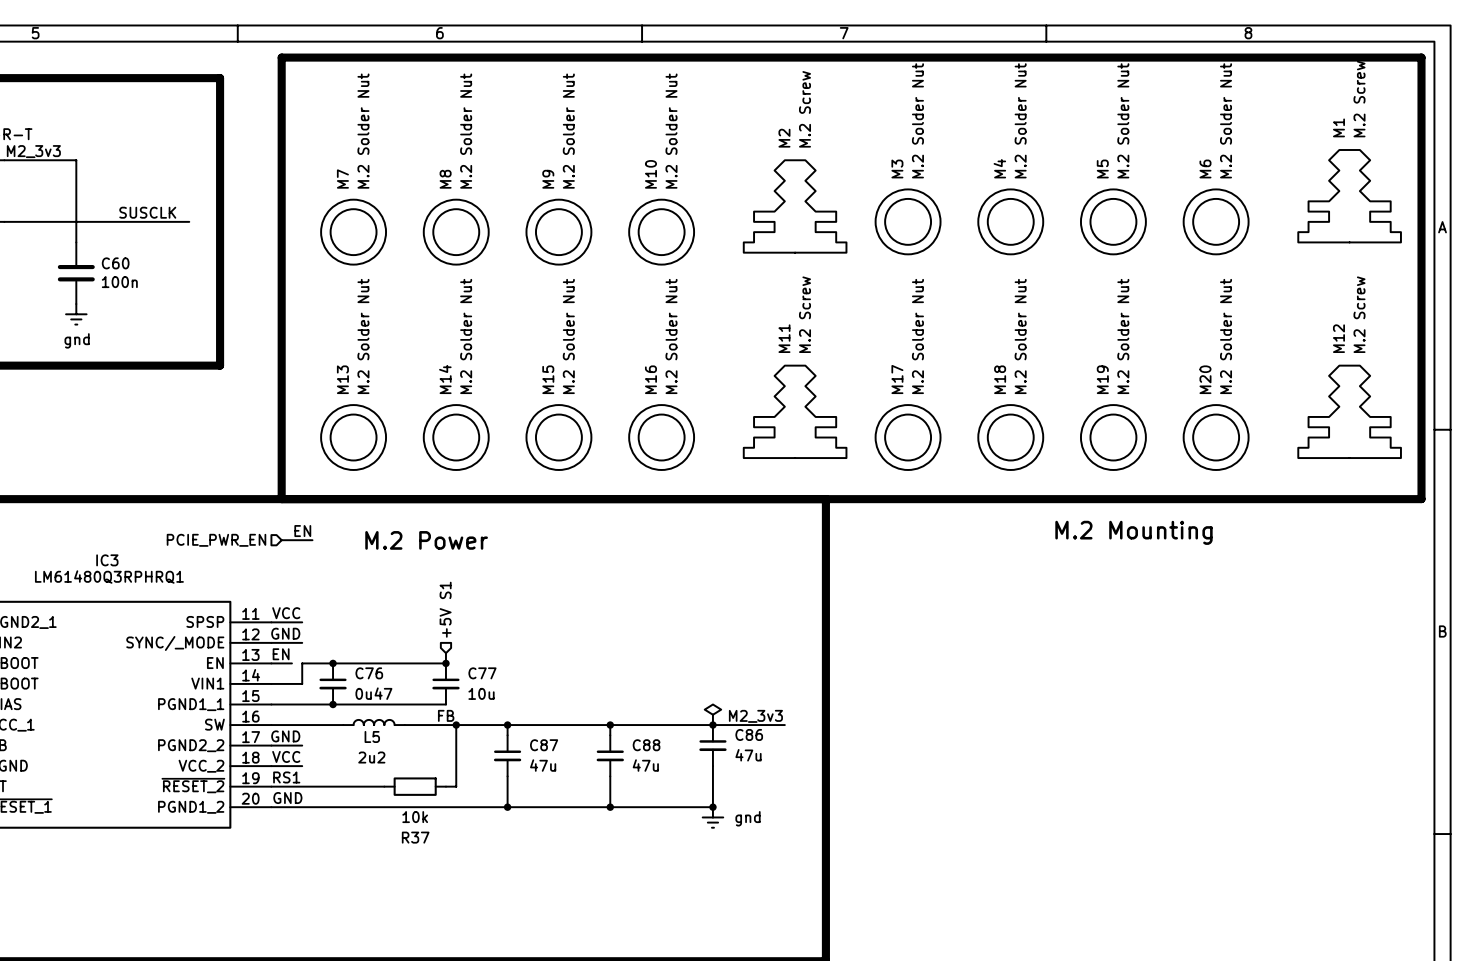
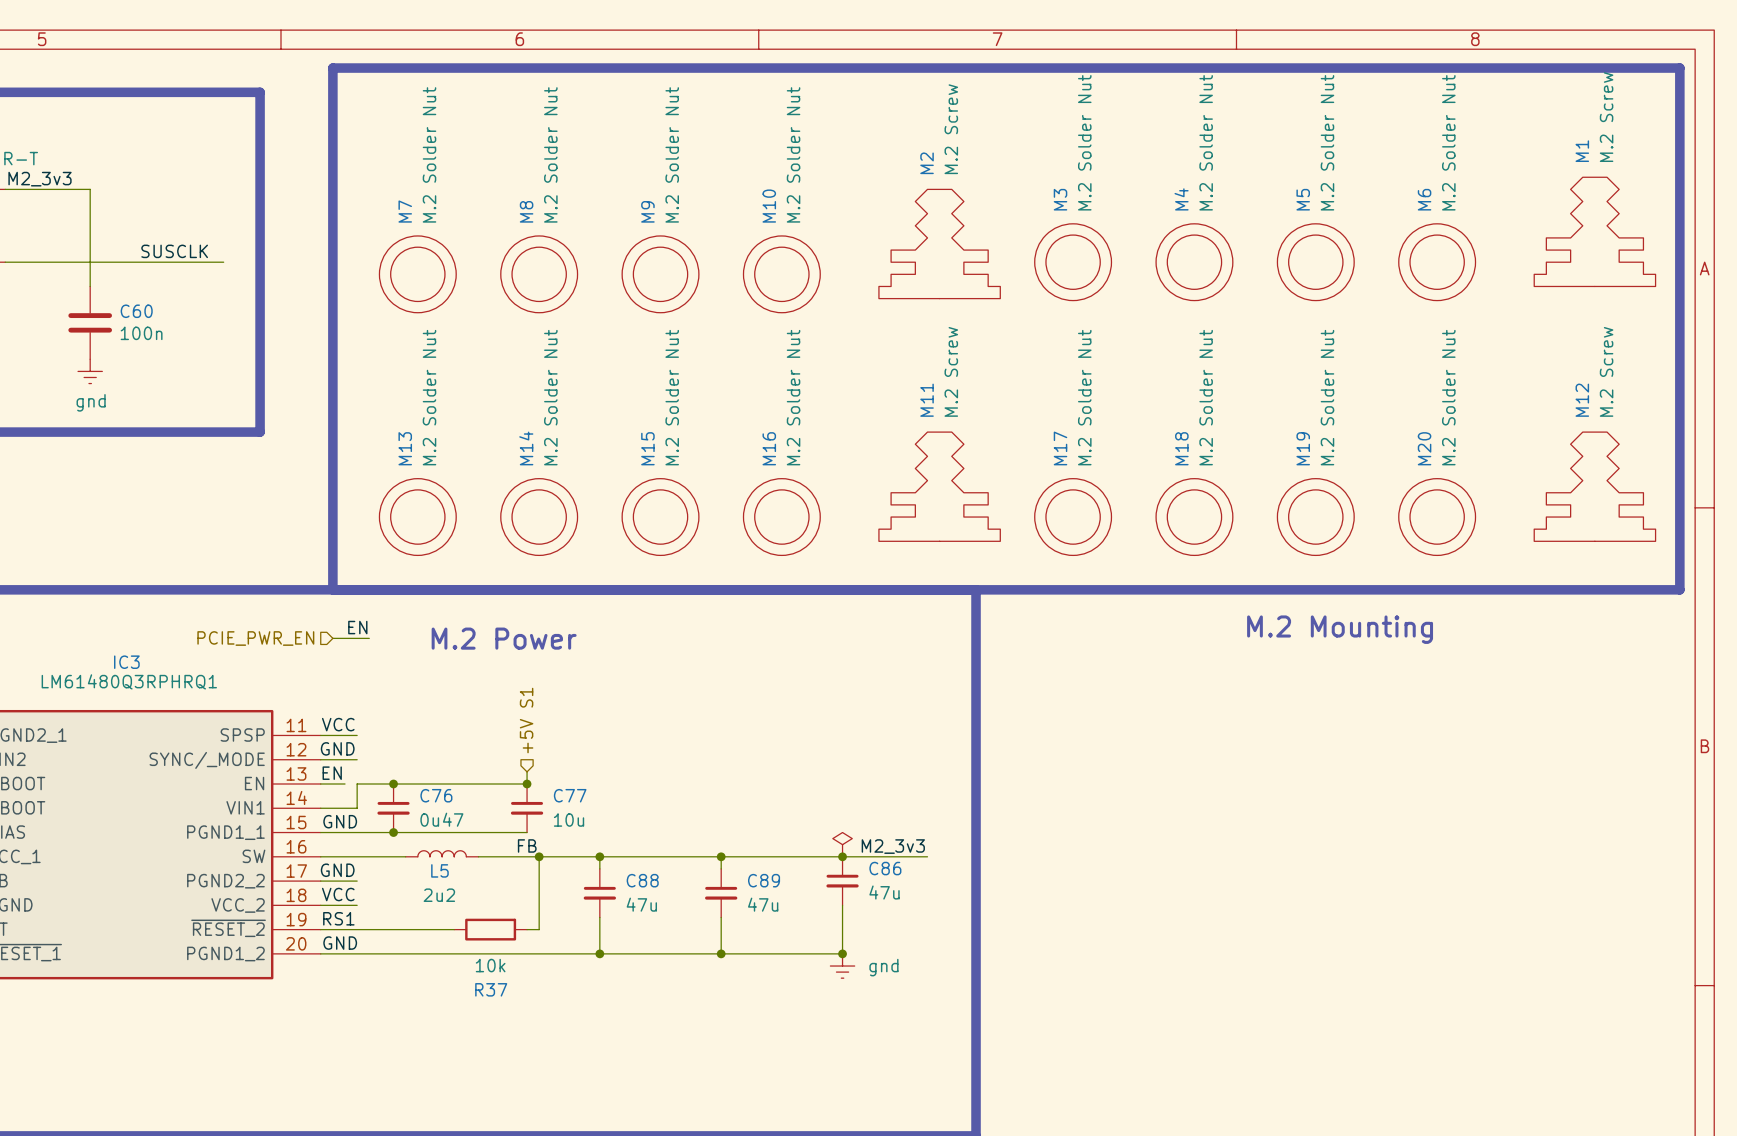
label: none -> GND (340, 821)
C87 name: C87 (544, 745) -> C88 (642, 880)
C88 name: C88 (646, 745) -> C89 (764, 880)

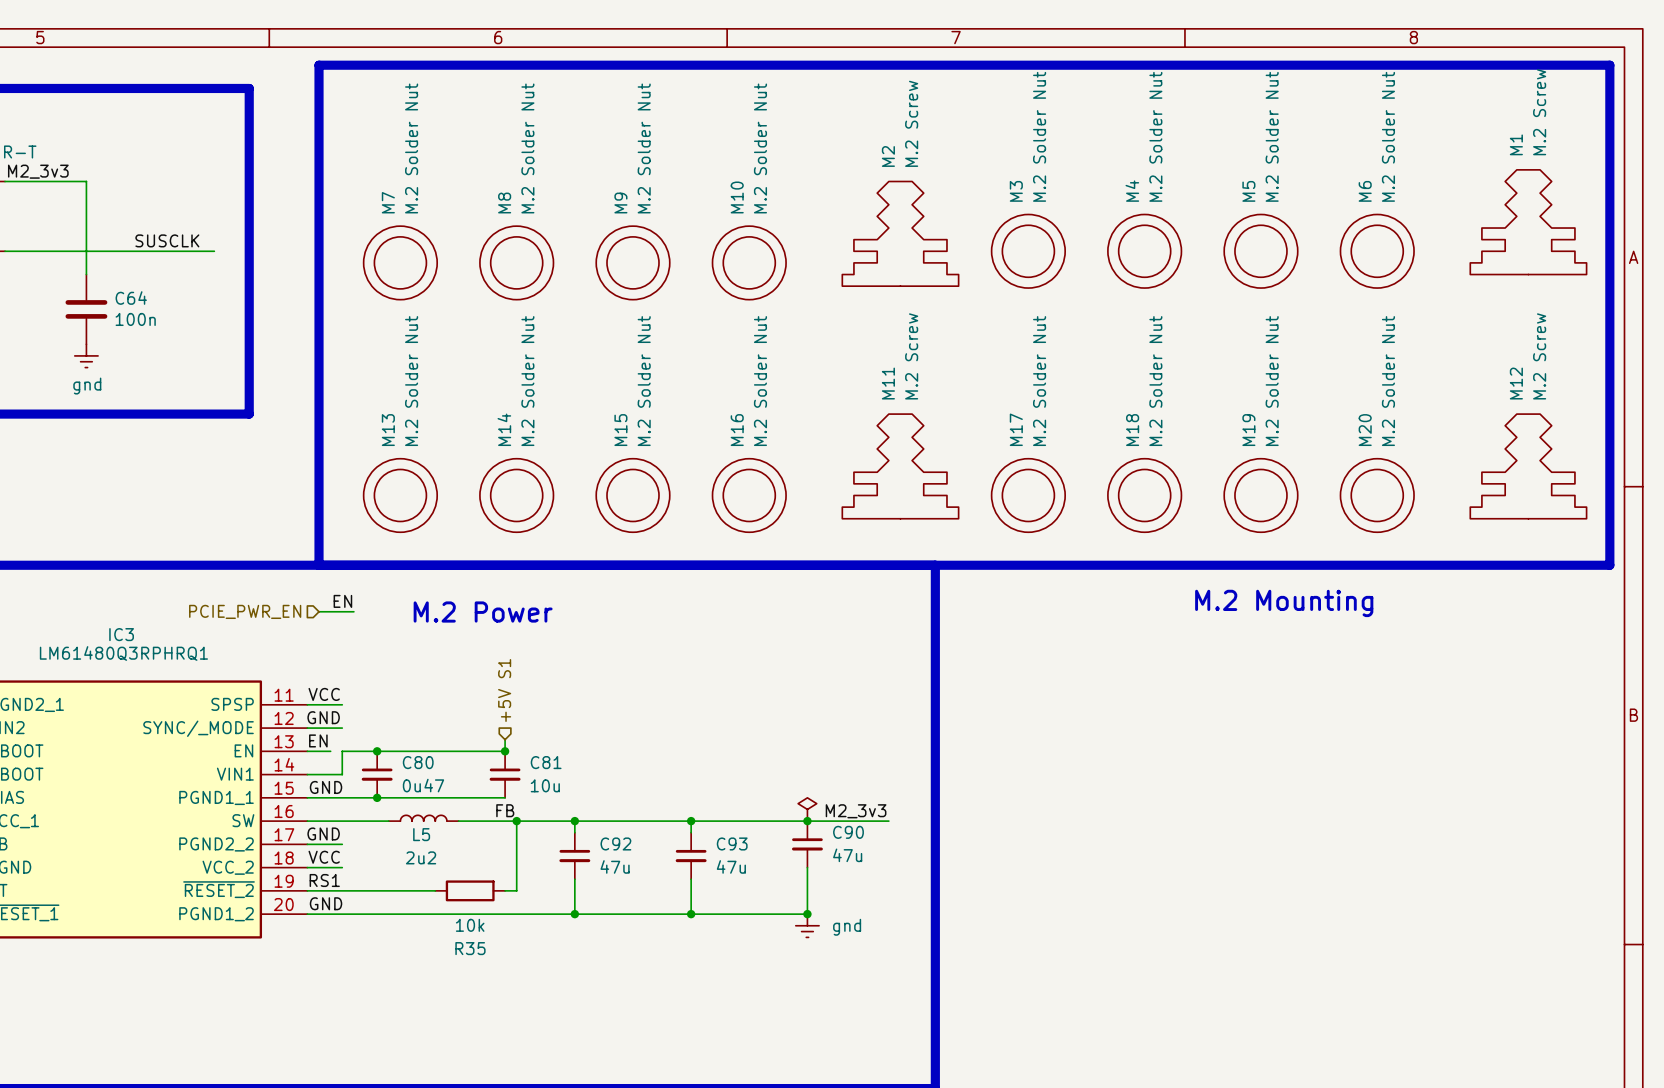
C60 name: C60 (136, 311) -> C64 (131, 298)
C76 name: C76 (436, 795) -> C80 (418, 762)
C77 name: C77 (570, 795) -> C81 (546, 762)
C86 name: C86 (885, 868) -> C90 (848, 832)
C88 name: C88 (642, 880) -> C92 (615, 843)
C89 name: C89 (764, 880) -> C93 (732, 843)
R37 name: R37 (491, 989) -> R35 (470, 948)

